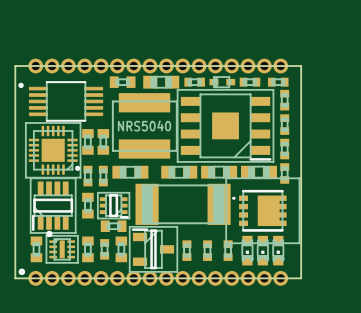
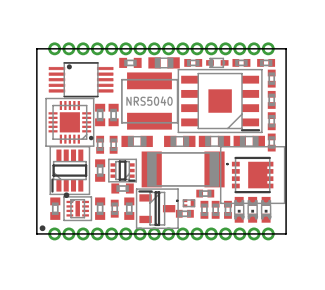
part footprint: [18, 81, 104, 122] -> [48, 62, 114, 98]
drawing: none -> [66, 64, 72, 70]
part: none -> (205, 193)
part: none -> (185, 203)
part rotation: 0° (186, 250) -> 90° clockwise (184, 213)
part: none -> (215, 209)
part: (228, 250) -> none
part: none -> (227, 209)

